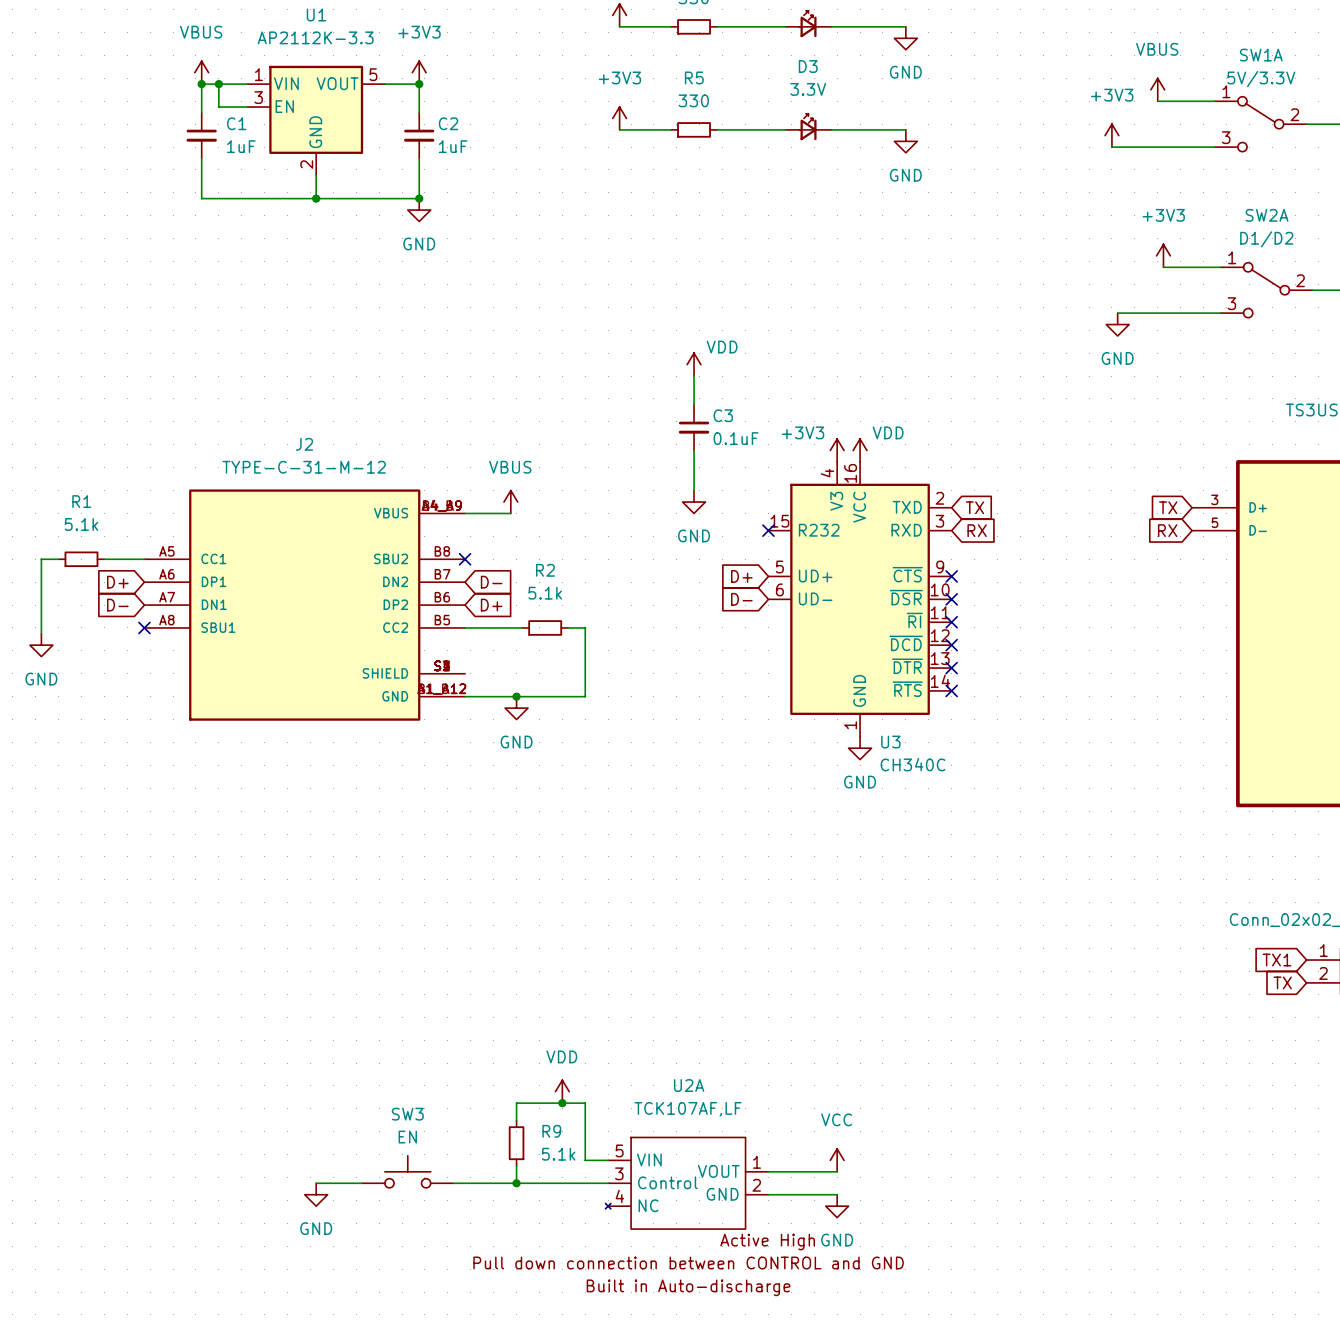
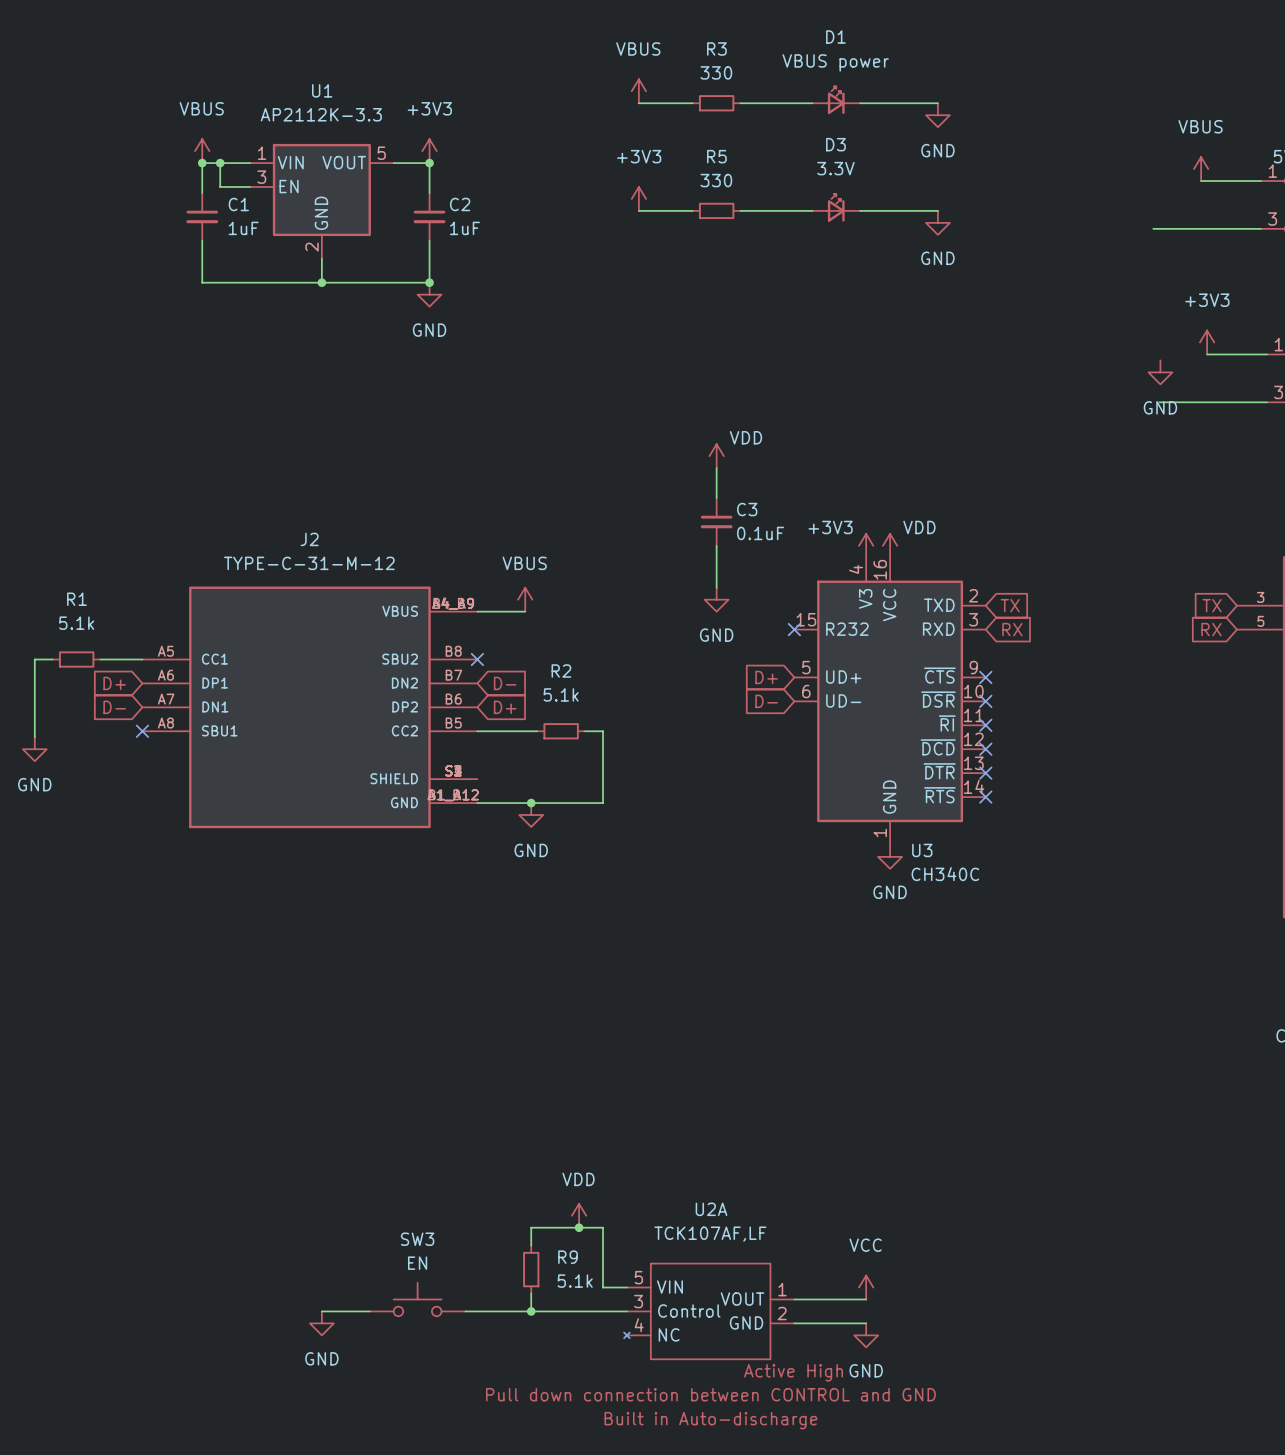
power symbol: +3V3 (1111, 135) -> none
power symbol position: GND (1117, 324) -> GND (1160, 372)

